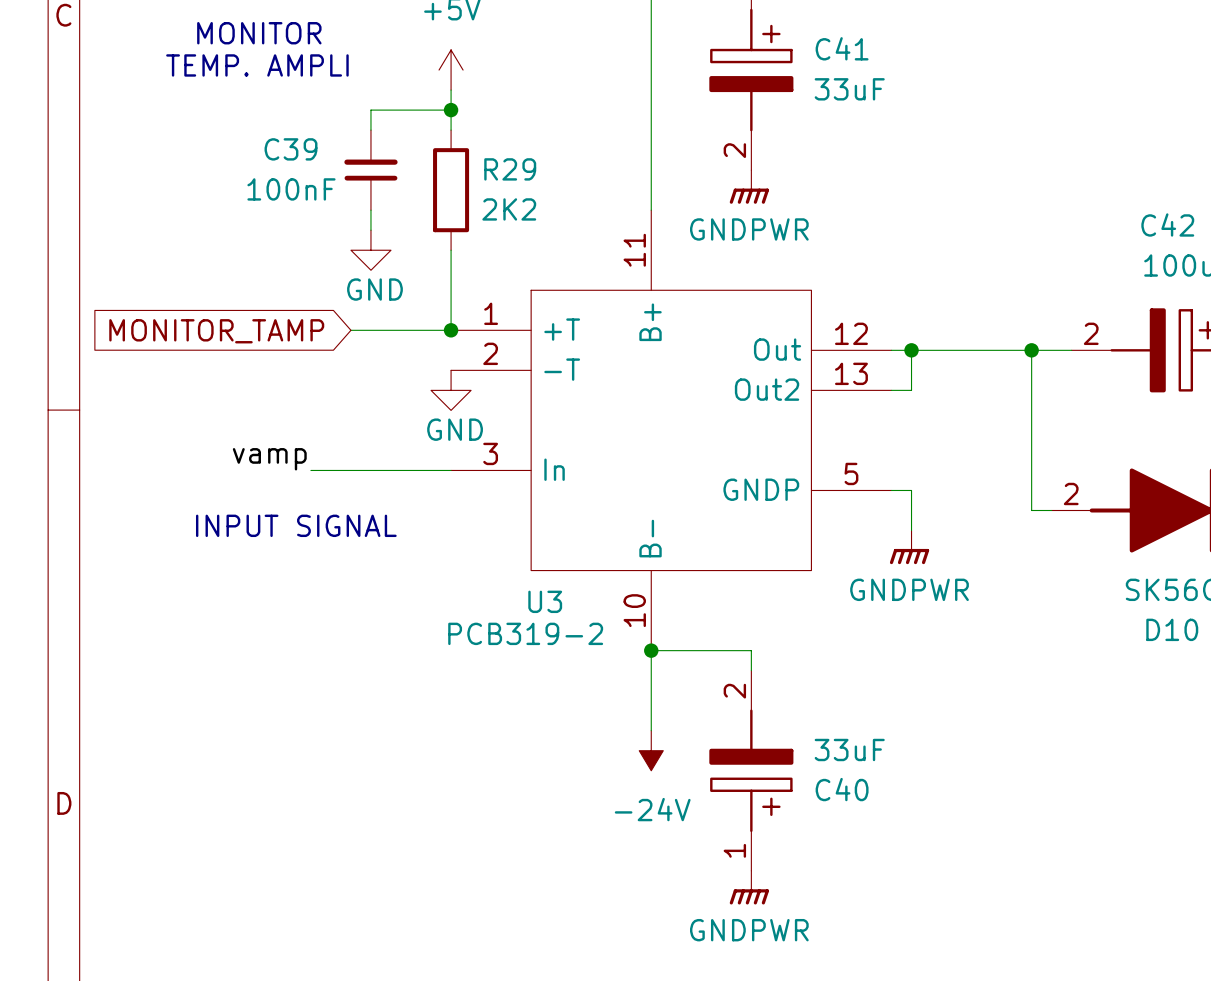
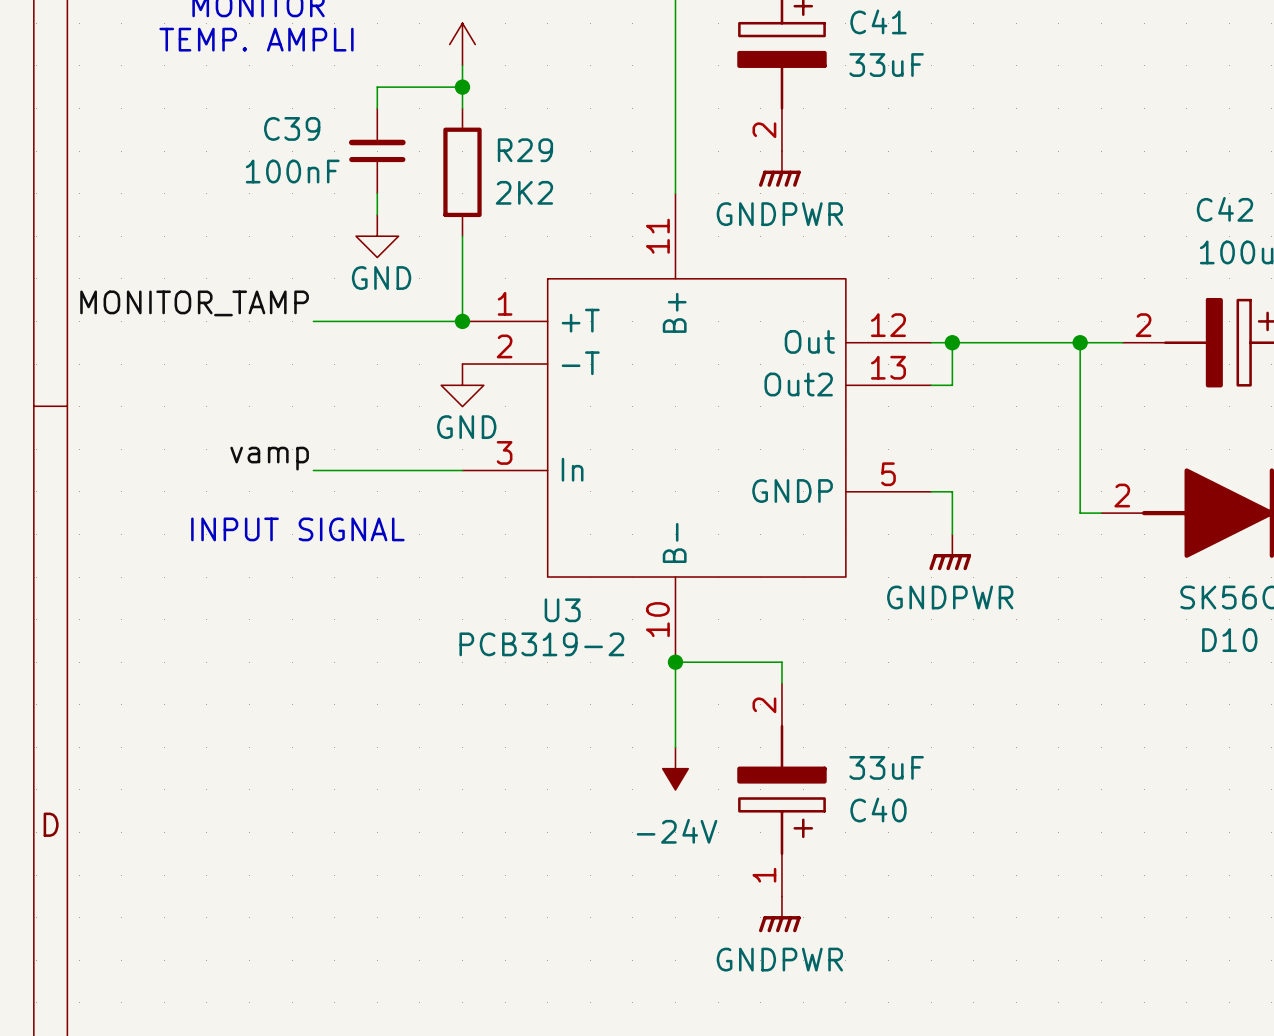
label: none -> MONITOR_TAMP (194, 303)
wire: none -> (313, 321) (356, 321)
global label: MONITOR_TAMP (216, 331) -> none

